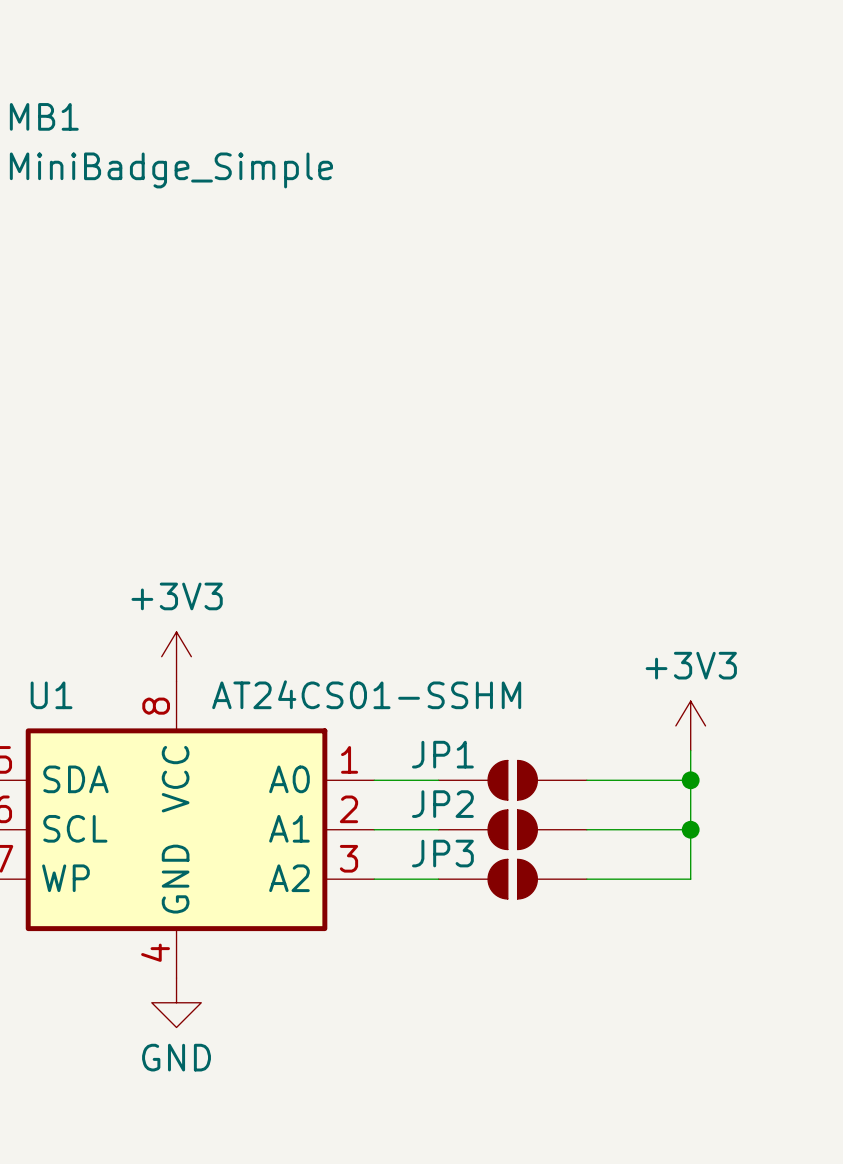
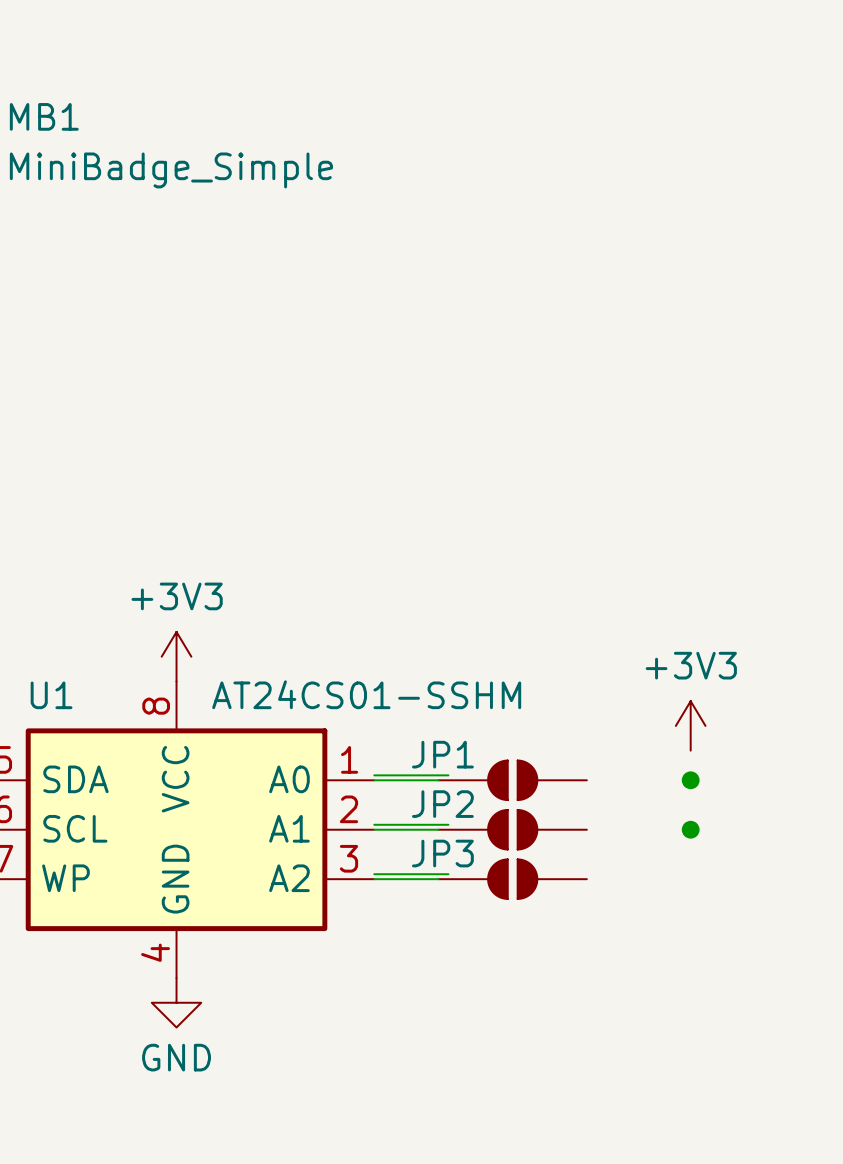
wire: (690, 750) (690, 879) (586, 879) -> none
wire: none -> (374, 775) (448, 775)
wire: (586, 780) (690, 780) -> none
wire: none -> (374, 824) (448, 824)
wire: (586, 829) (690, 829) -> none
wire: none -> (374, 874) (448, 874)

